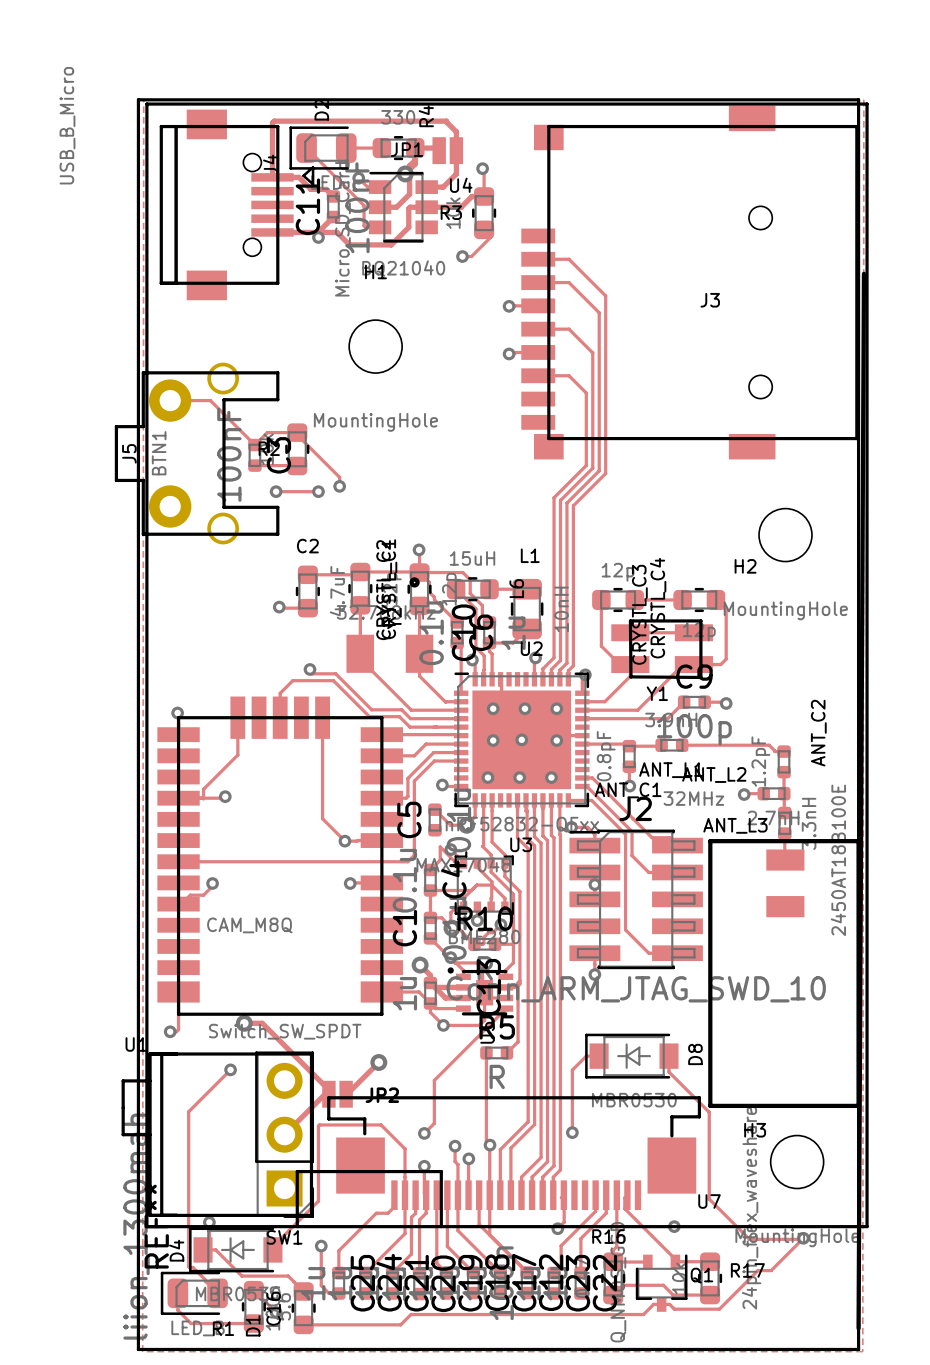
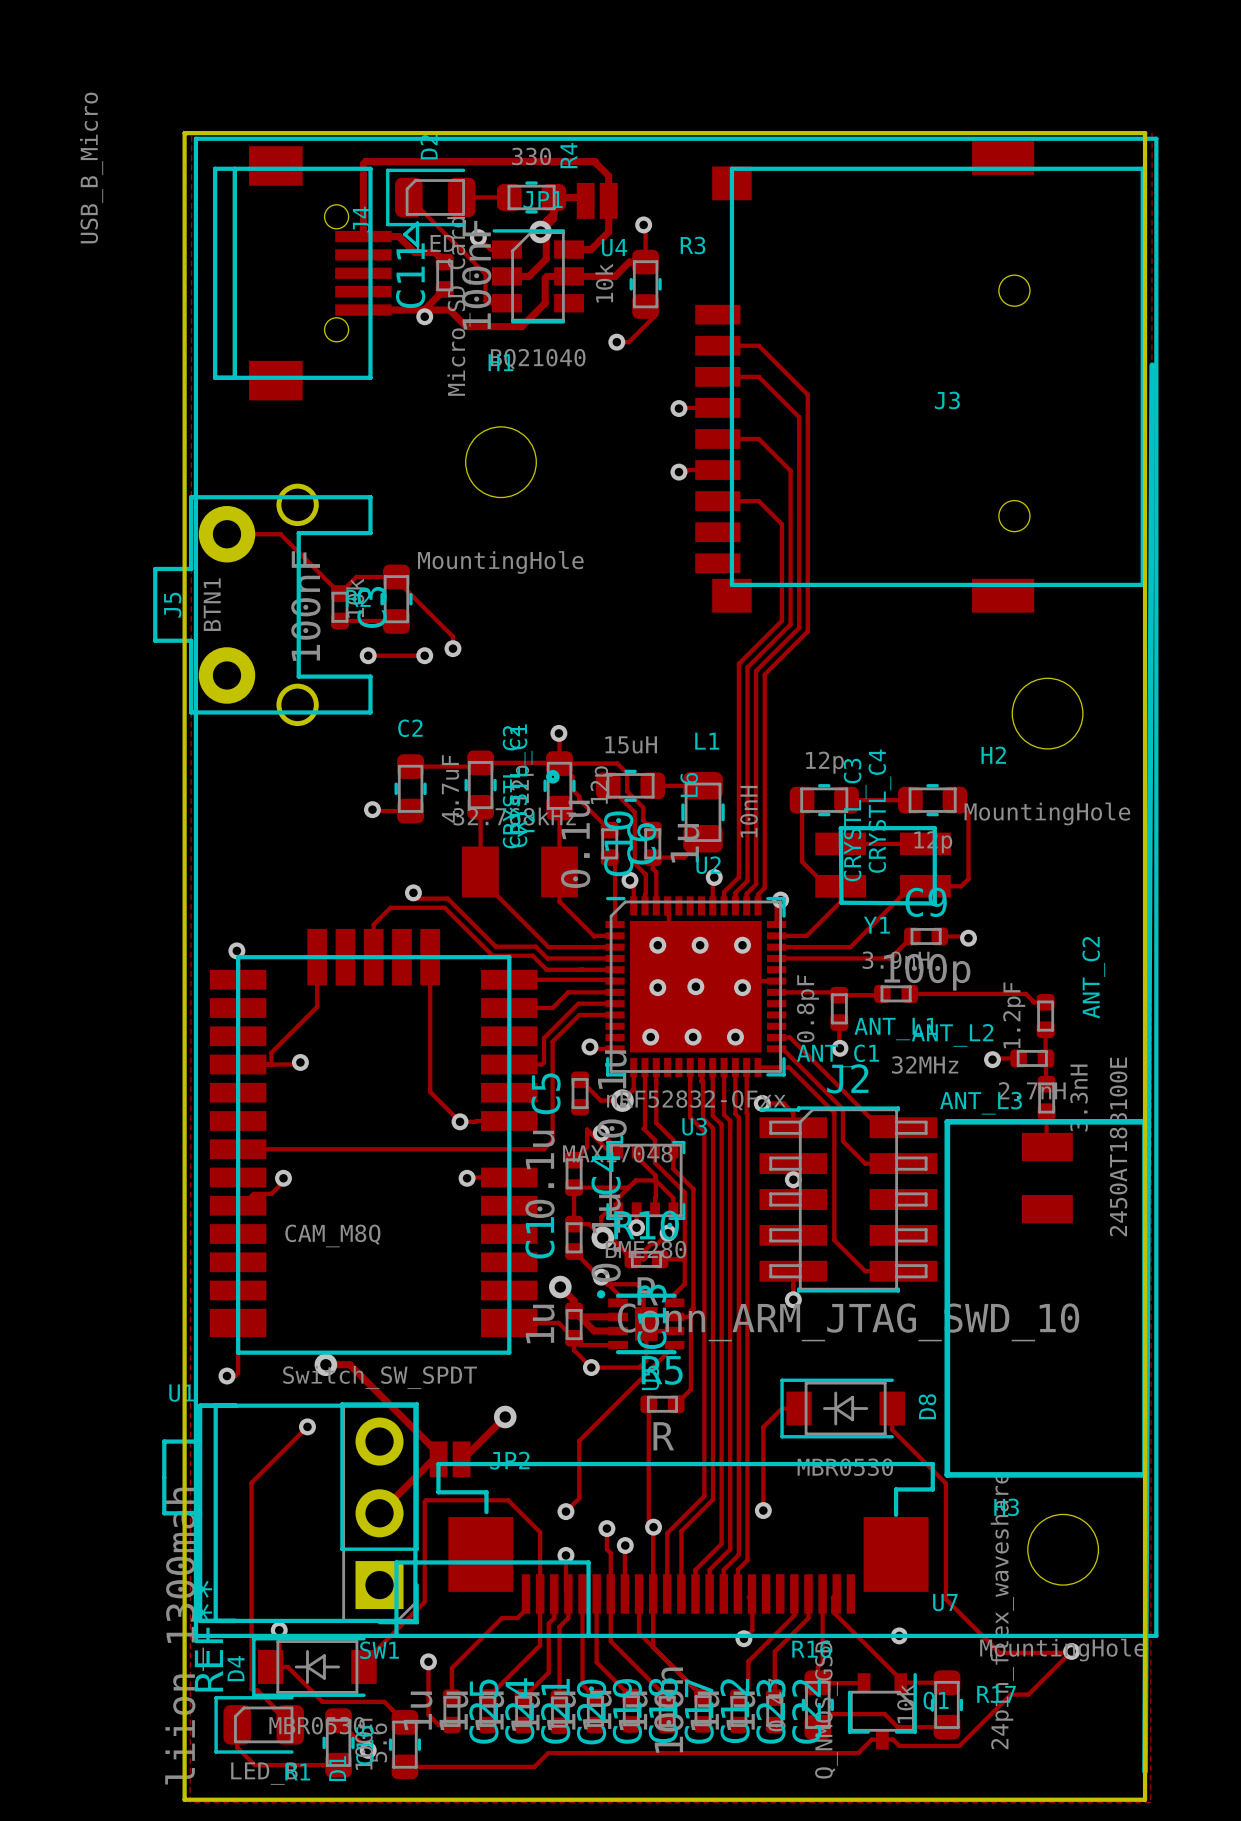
R3 name position: R3 (451, 212) -> R3 (693, 245)

